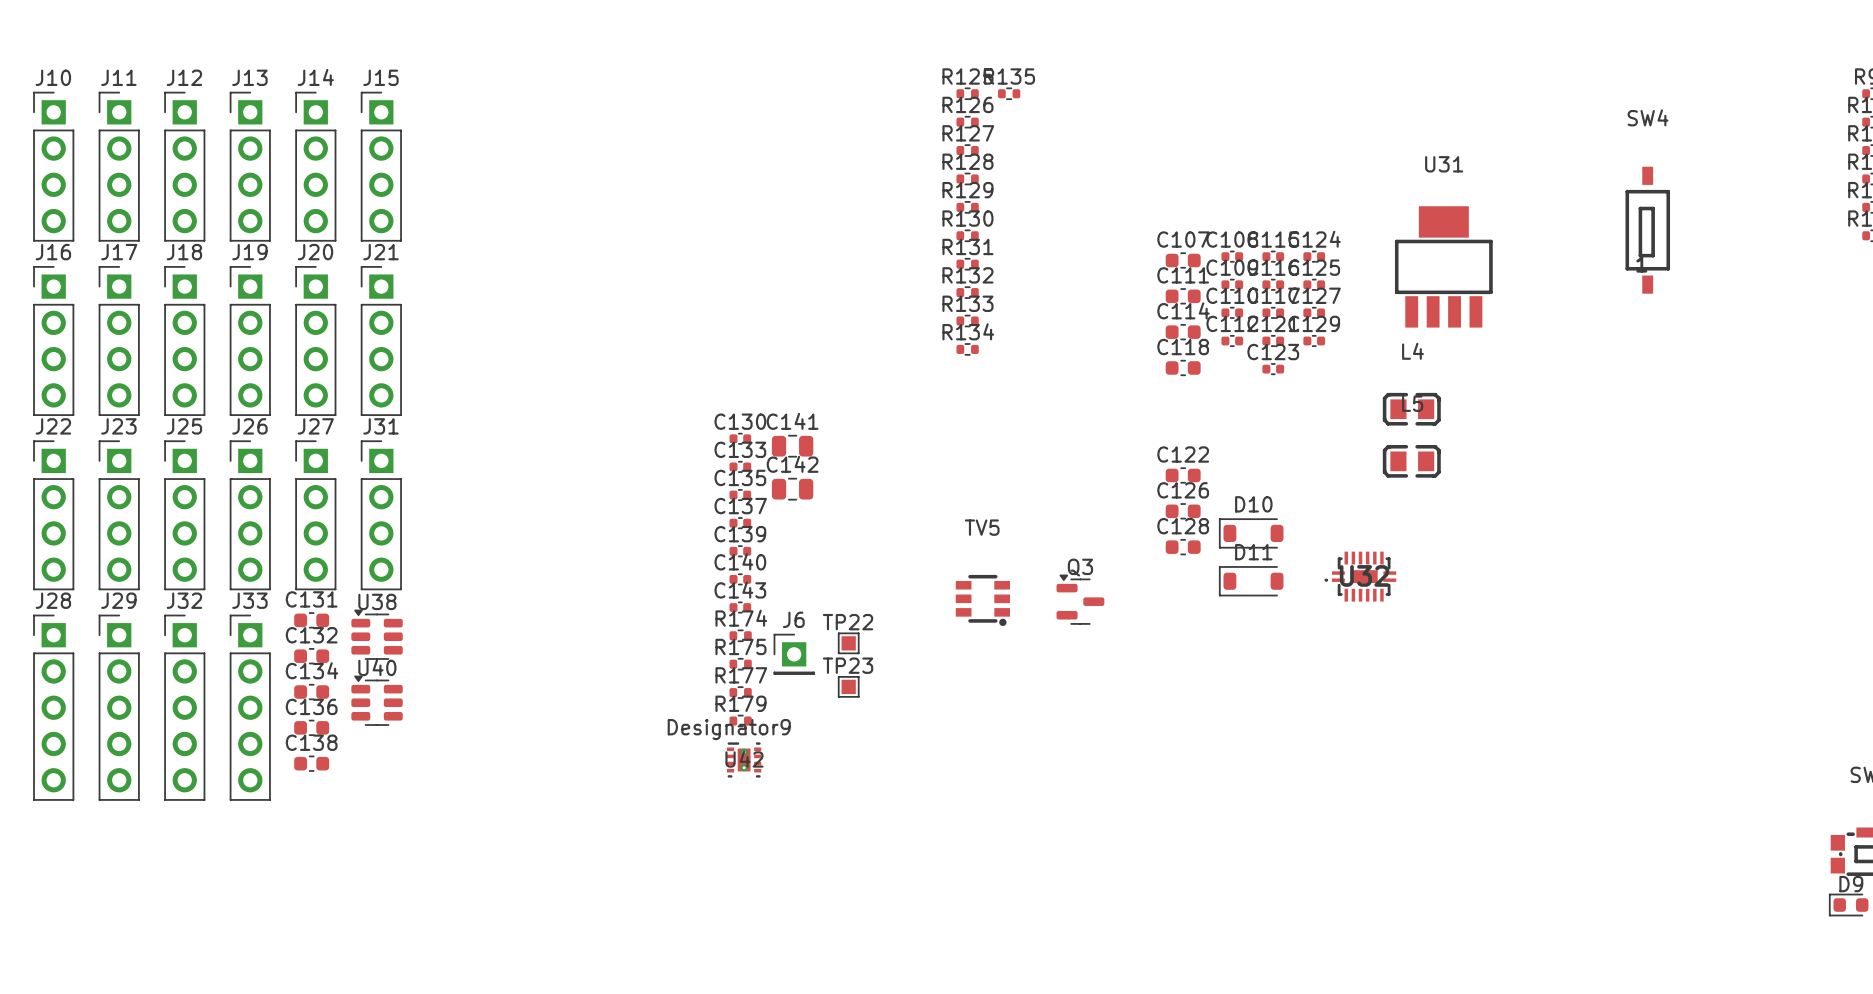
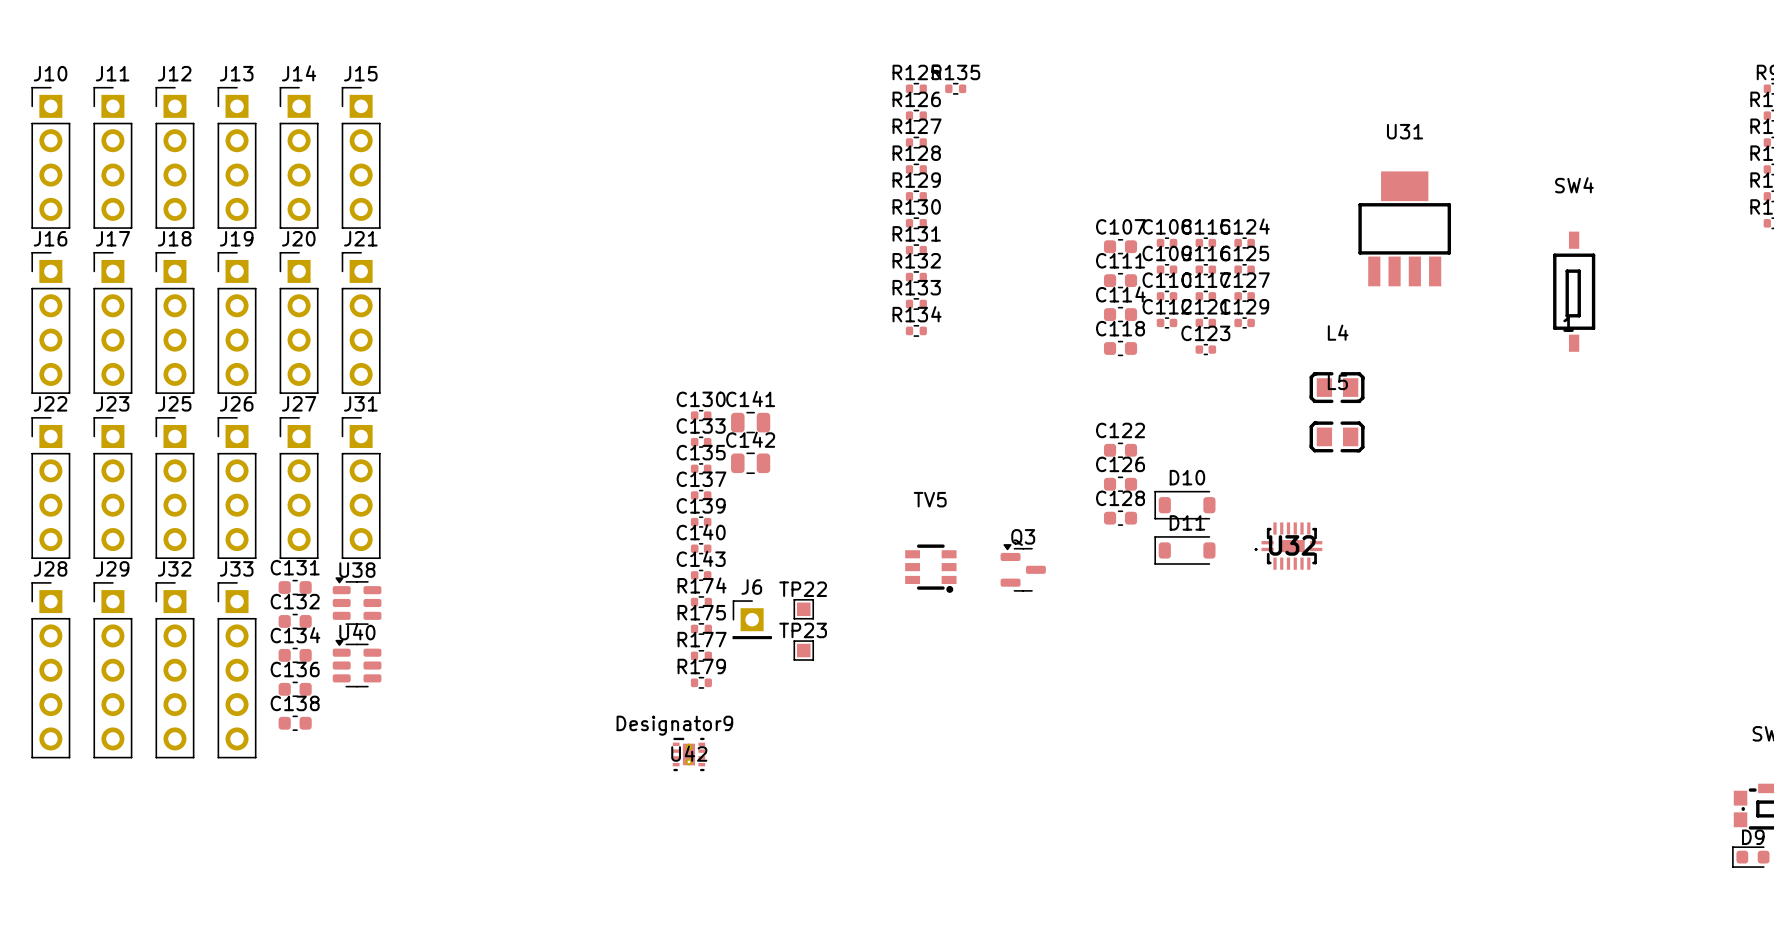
SW4 position: (1647, 230) -> (1574, 291)
U31 position: (1443, 266) -> (1404, 228)
U42 position: (744, 759) -> (688, 754)

